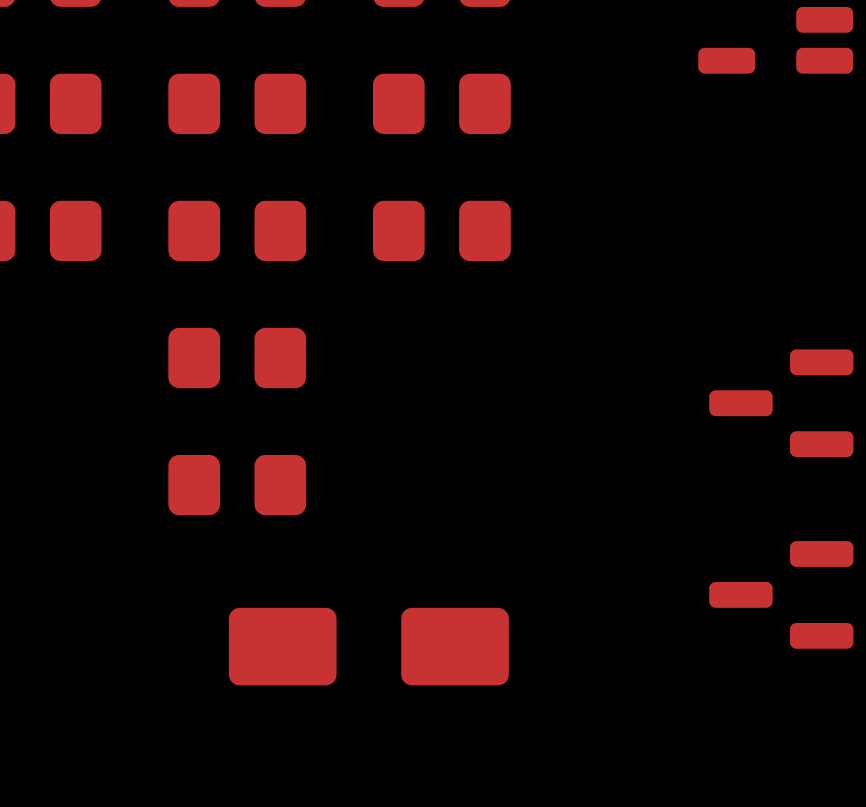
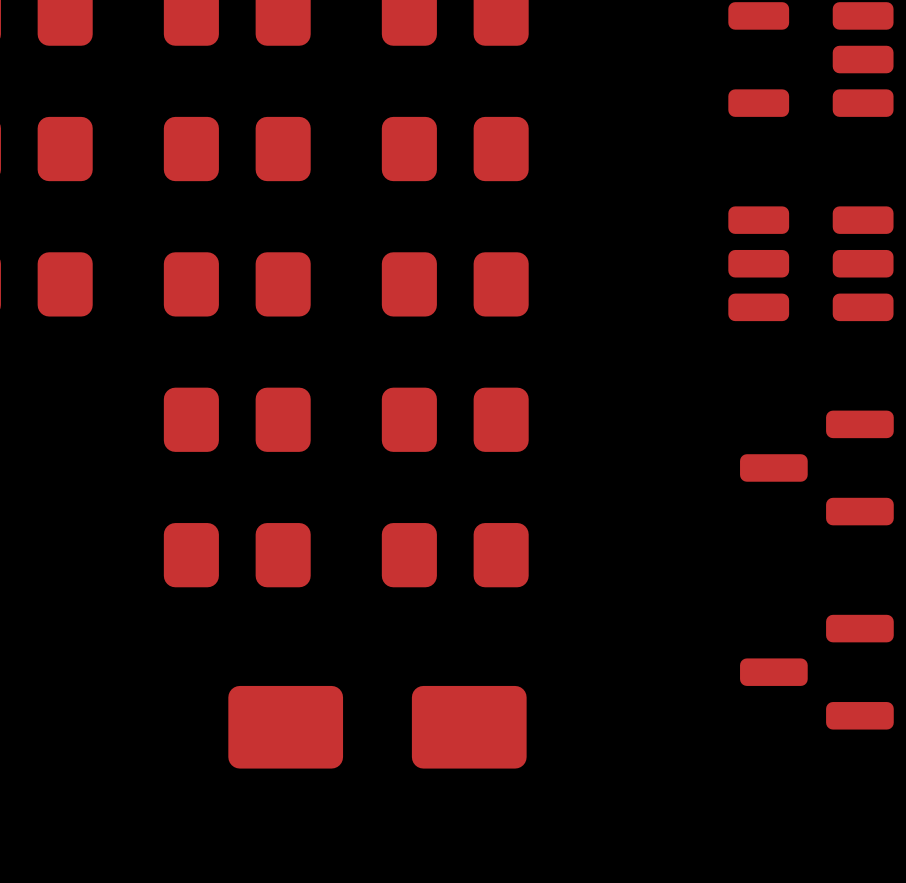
part: none -> (810, 263)
part: none -> (455, 419)
part: none -> (455, 555)

